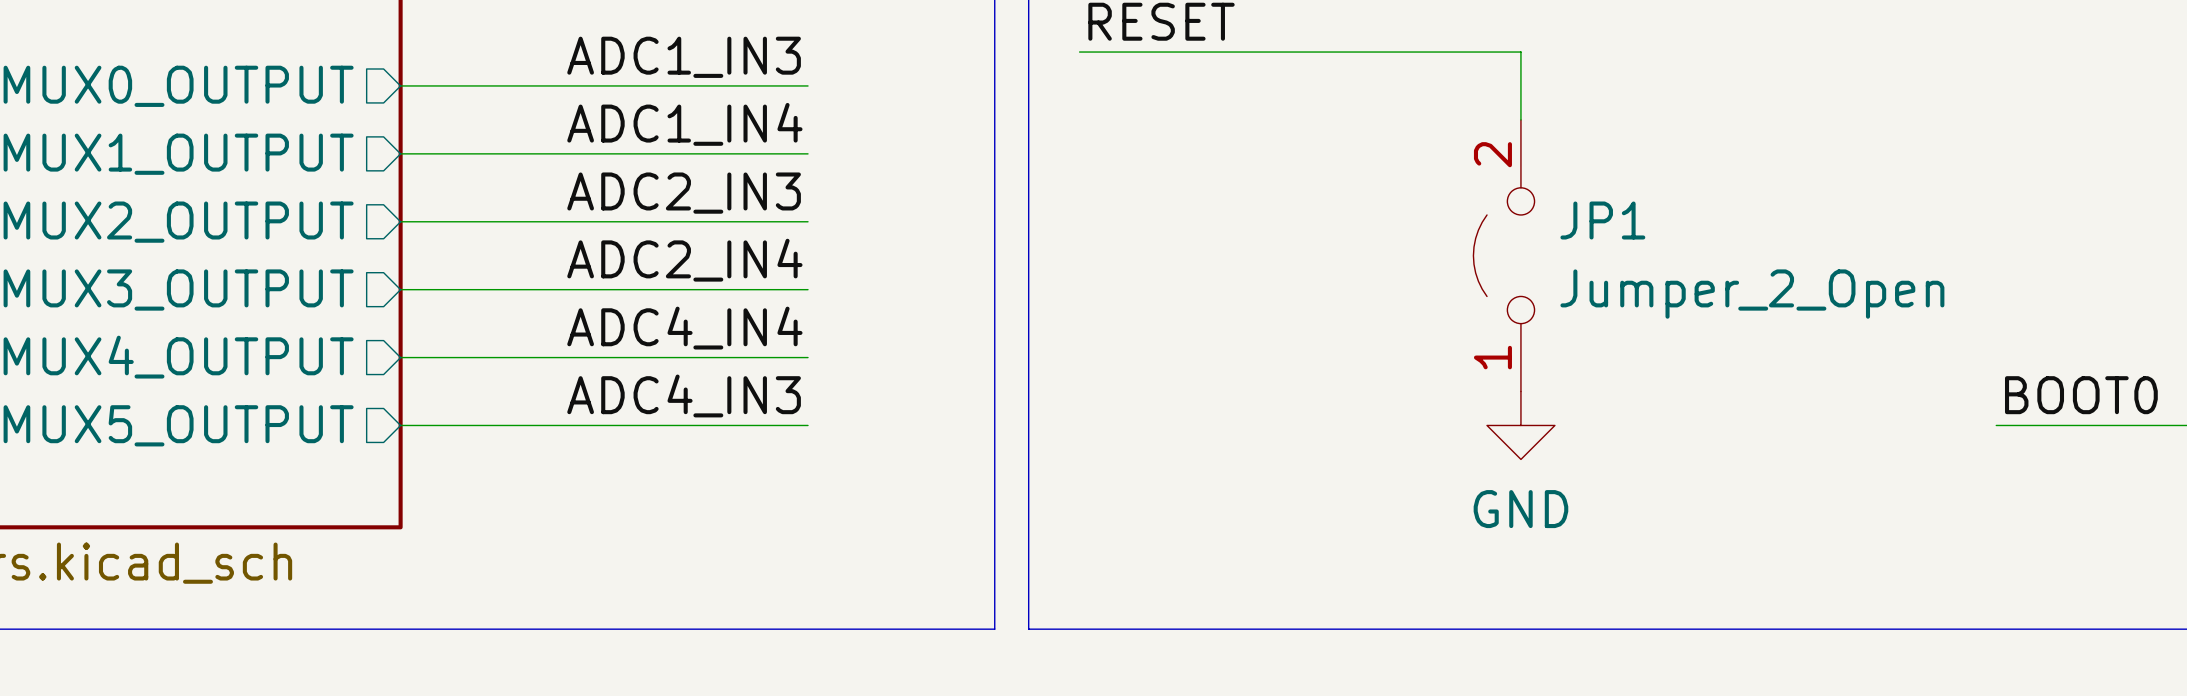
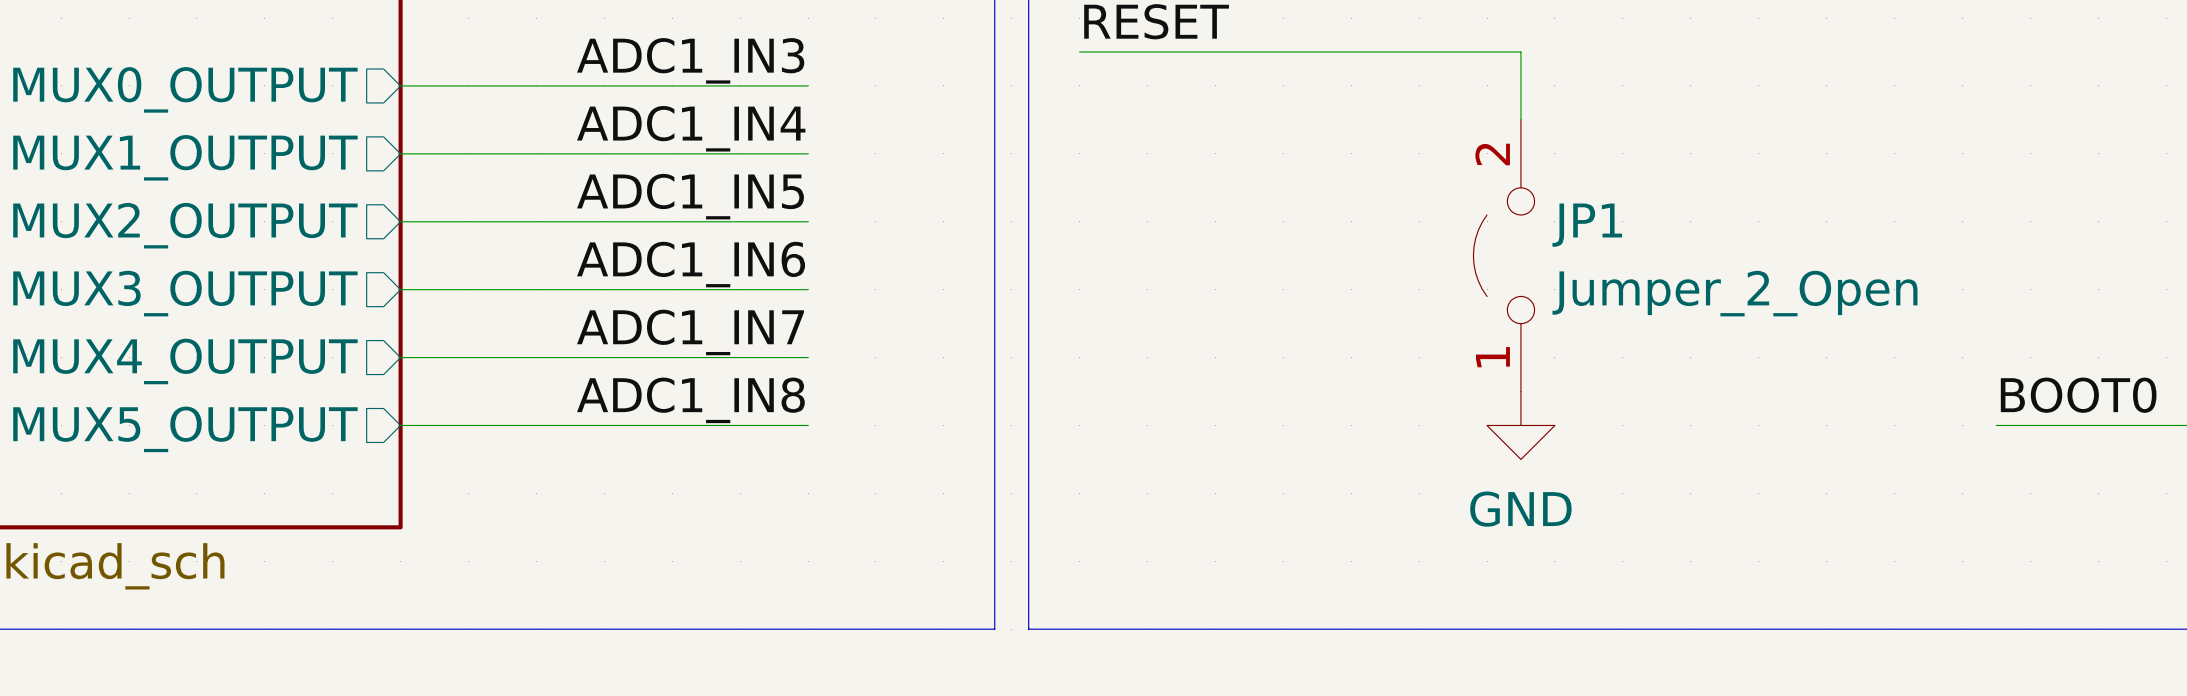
label: ADC2_IN3 (684, 193) -> ADC1_IN5 (690, 196)
label: ADC2_IN4 (684, 260) -> ADC1_IN6 (691, 264)
label: ADC4_IN4 (684, 328) -> ADC1_IN7 (690, 332)
label: ADC4_IN3 (684, 395) -> ADC1_IN8 (690, 400)

